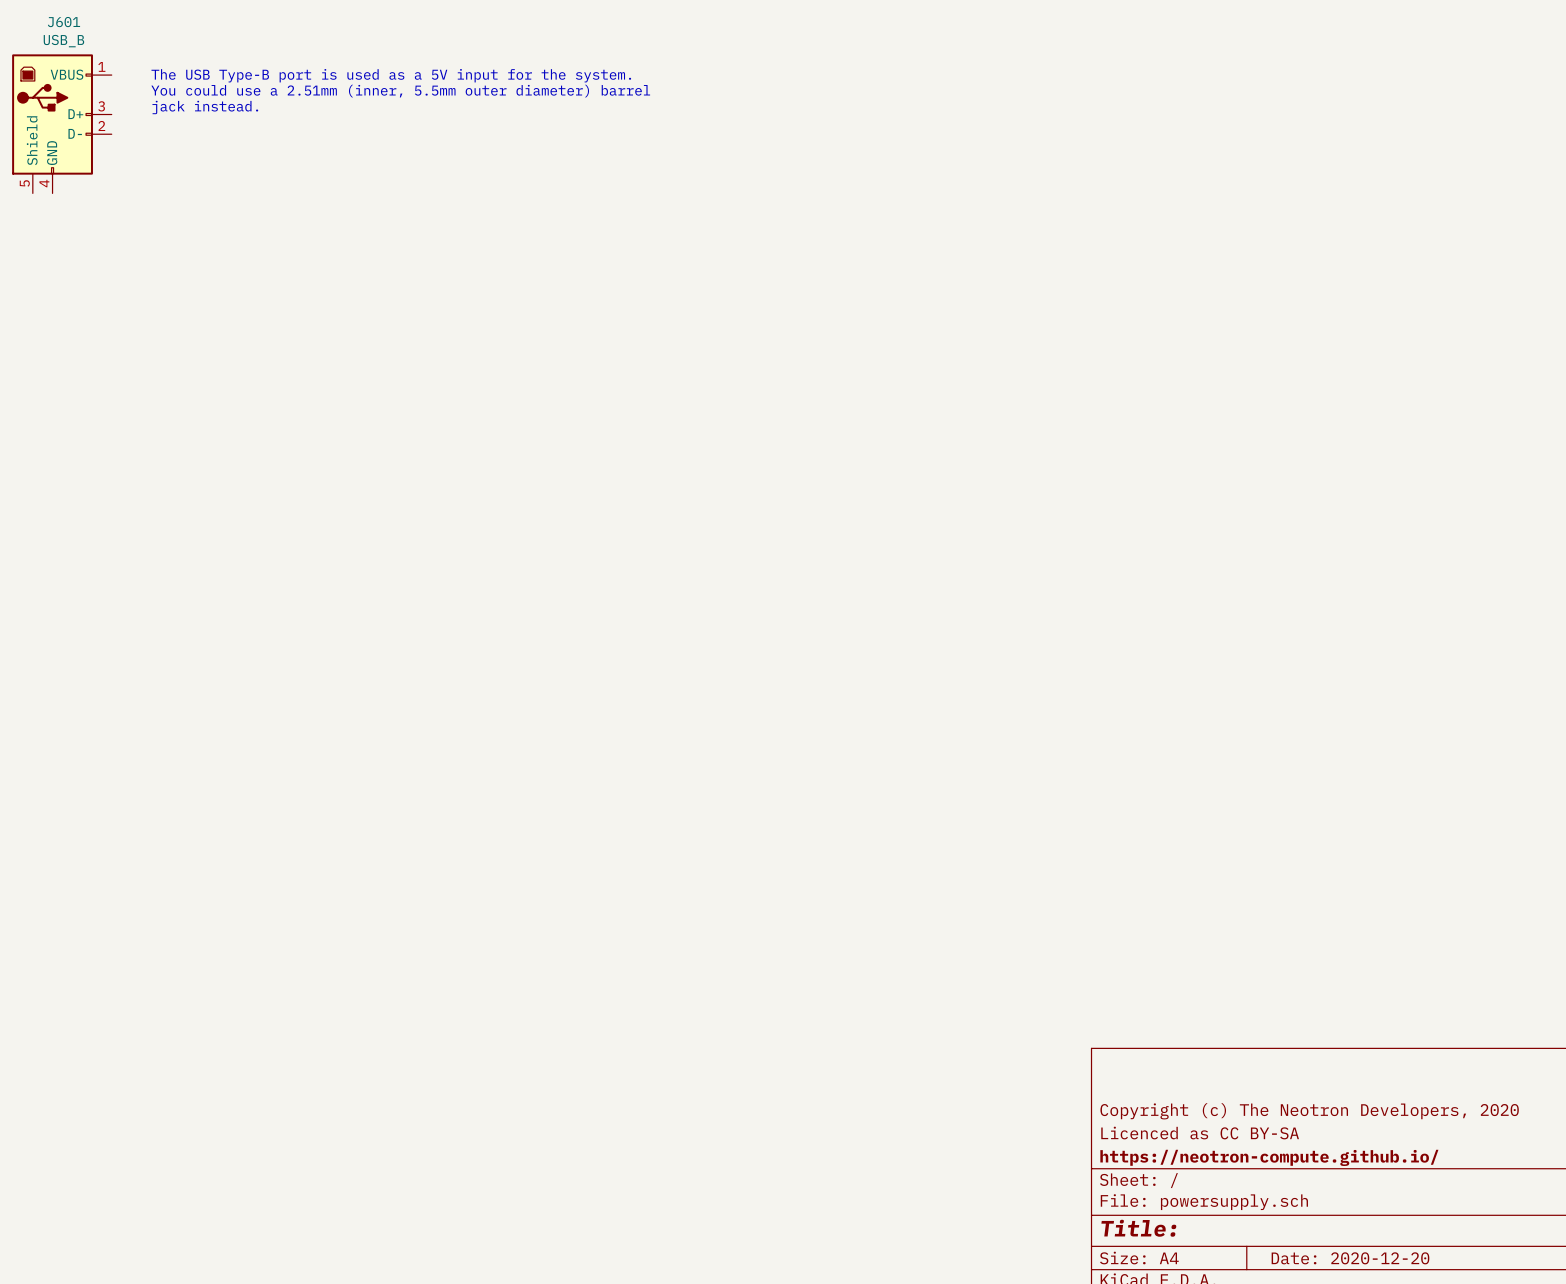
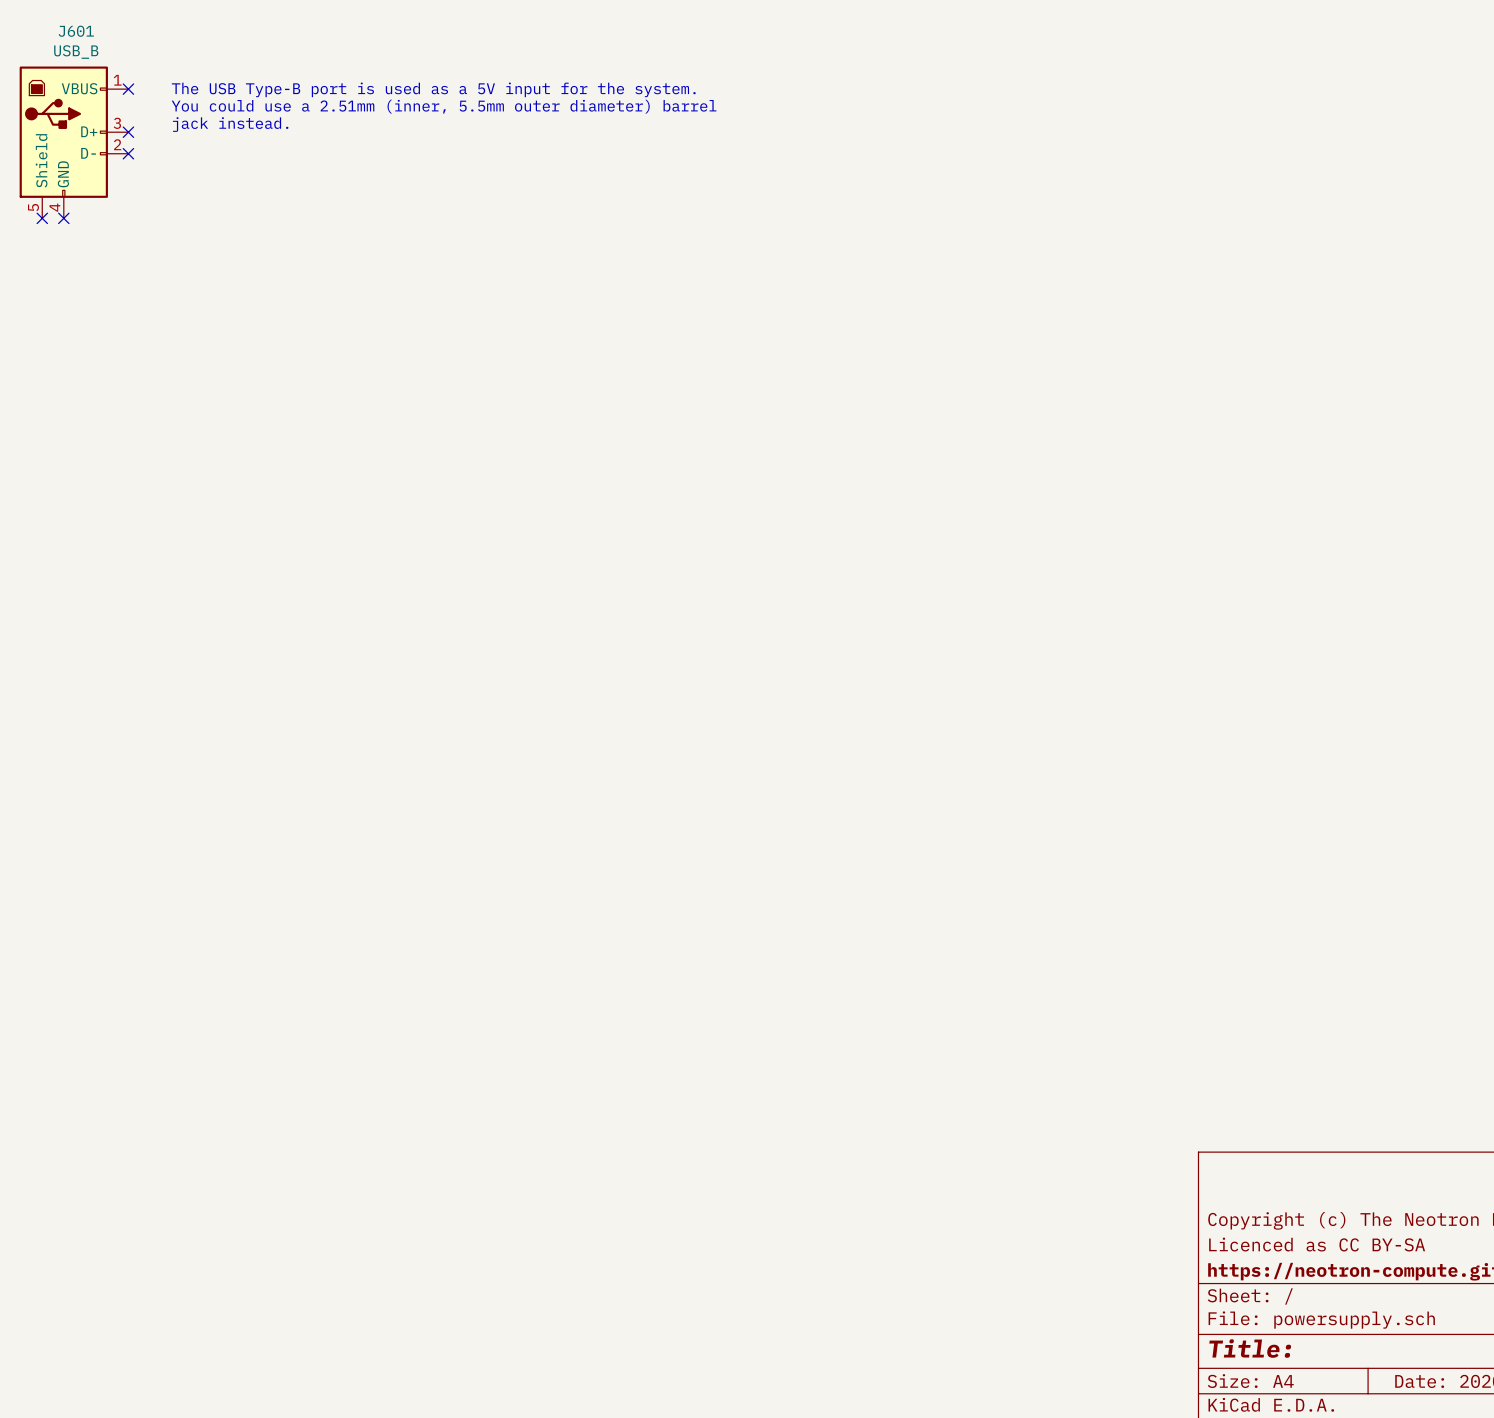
no-connect mark: none -> (128, 89)
no-connect mark: none -> (128, 132)
no-connect mark: none -> (128, 153)
no-connect mark: none -> (42, 218)
no-connect mark: none -> (63, 218)

